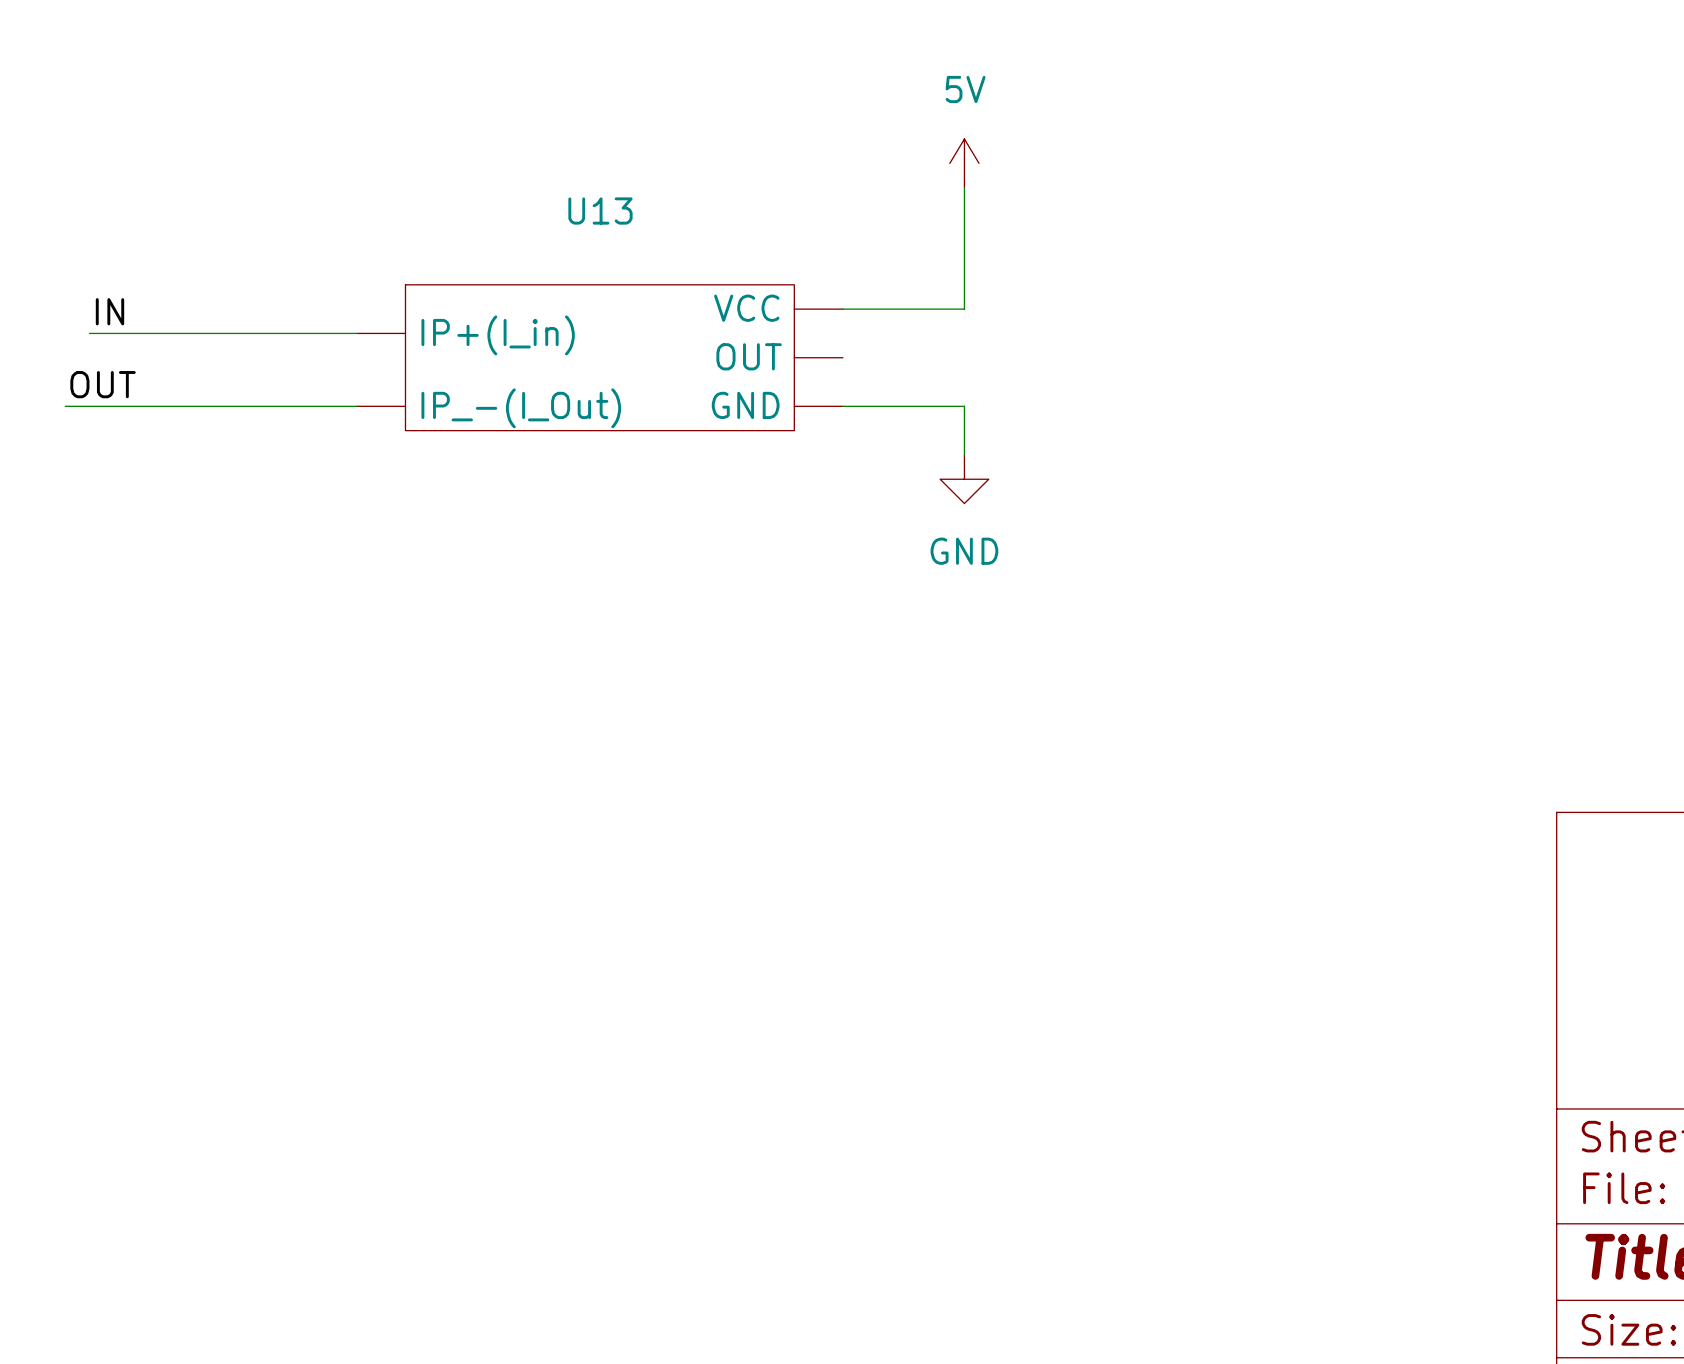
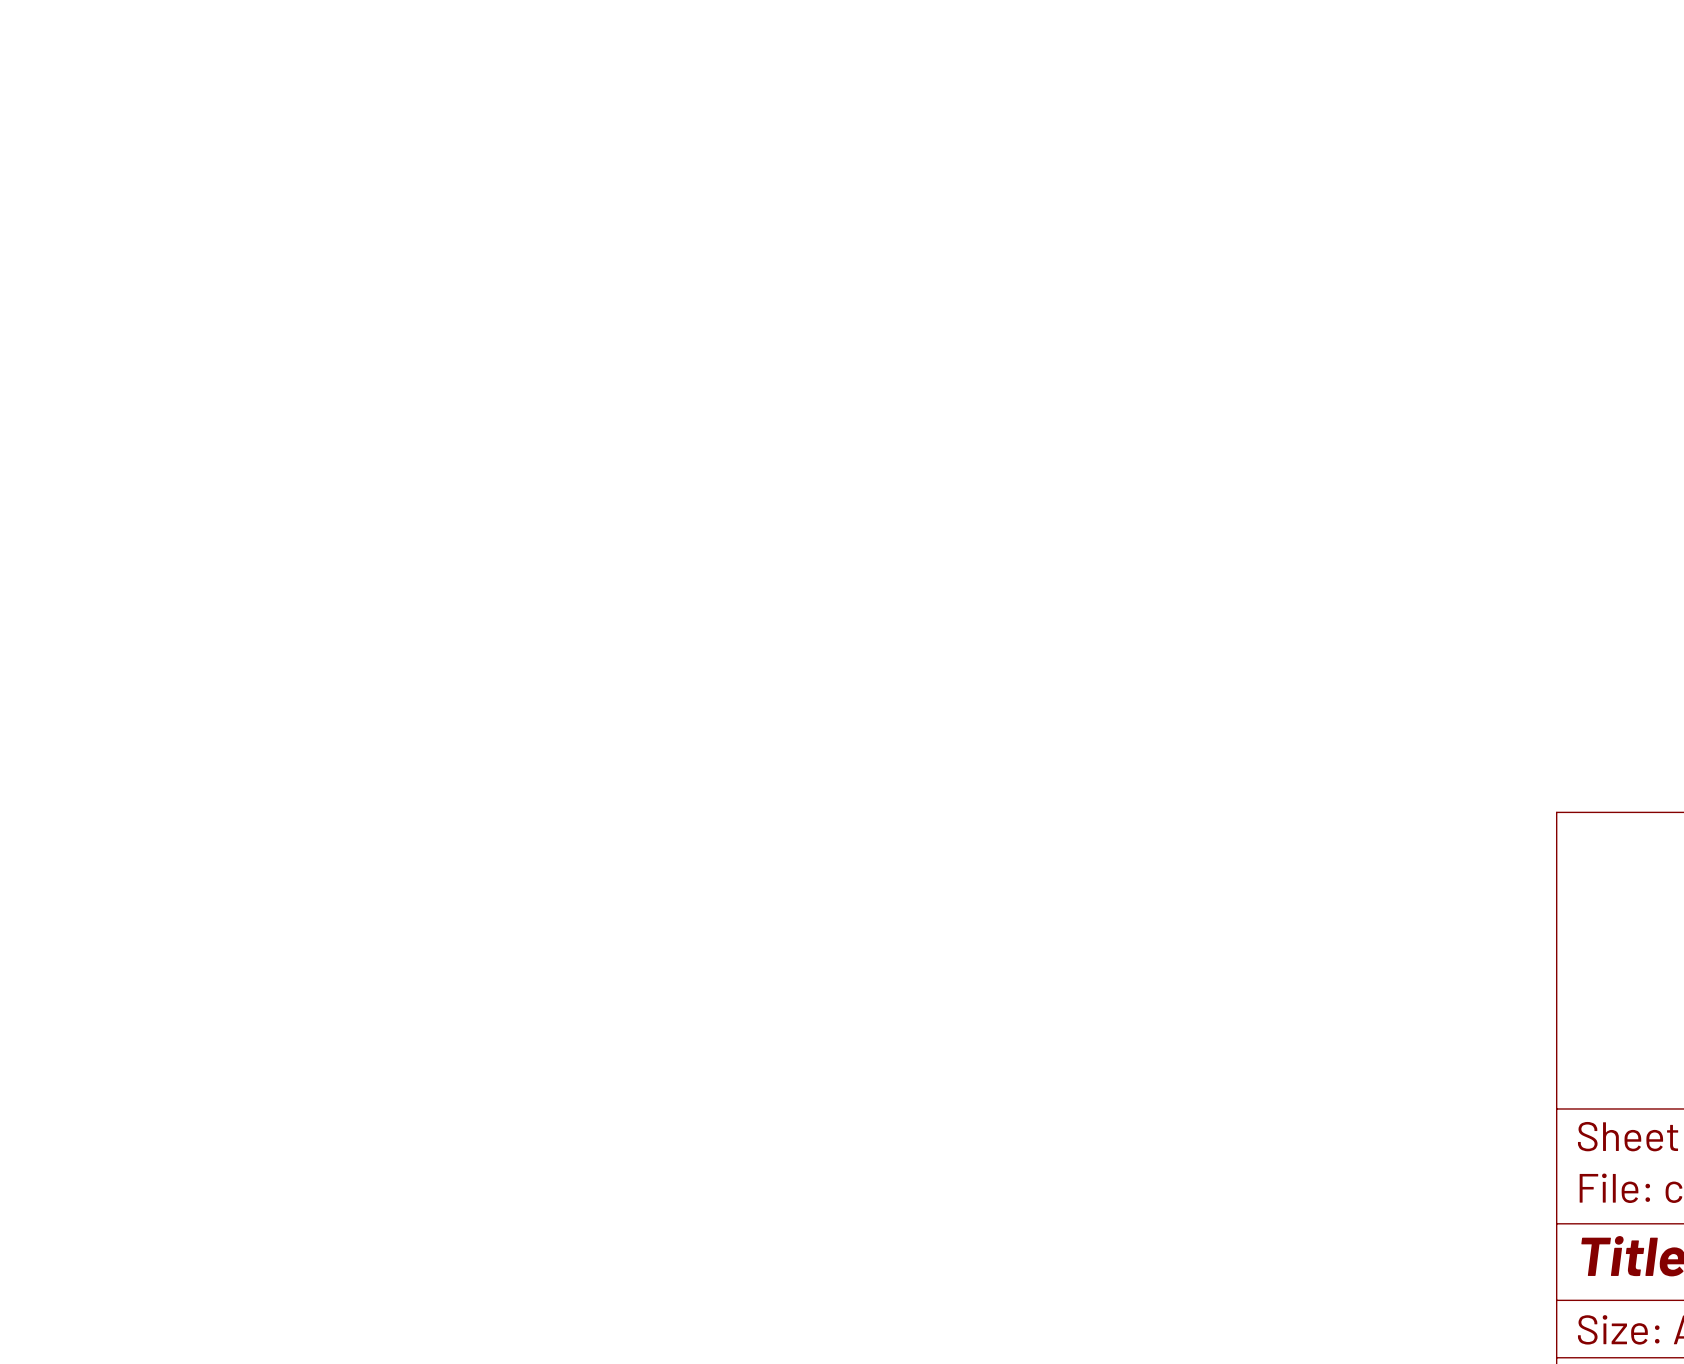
power symbol: 5V (964, 163) -> none
wire: (964, 187) (964, 309) (842, 309) -> none
label: IN (109, 311) -> none
wire: (89, 333) (356, 333) -> none
U13: (599, 357) -> none
label: OUT (103, 384) -> none
wire: (65, 406) (356, 406) -> none
wire: (842, 406) (964, 406) (964, 454) -> none
power symbol: GND (964, 479) -> none

